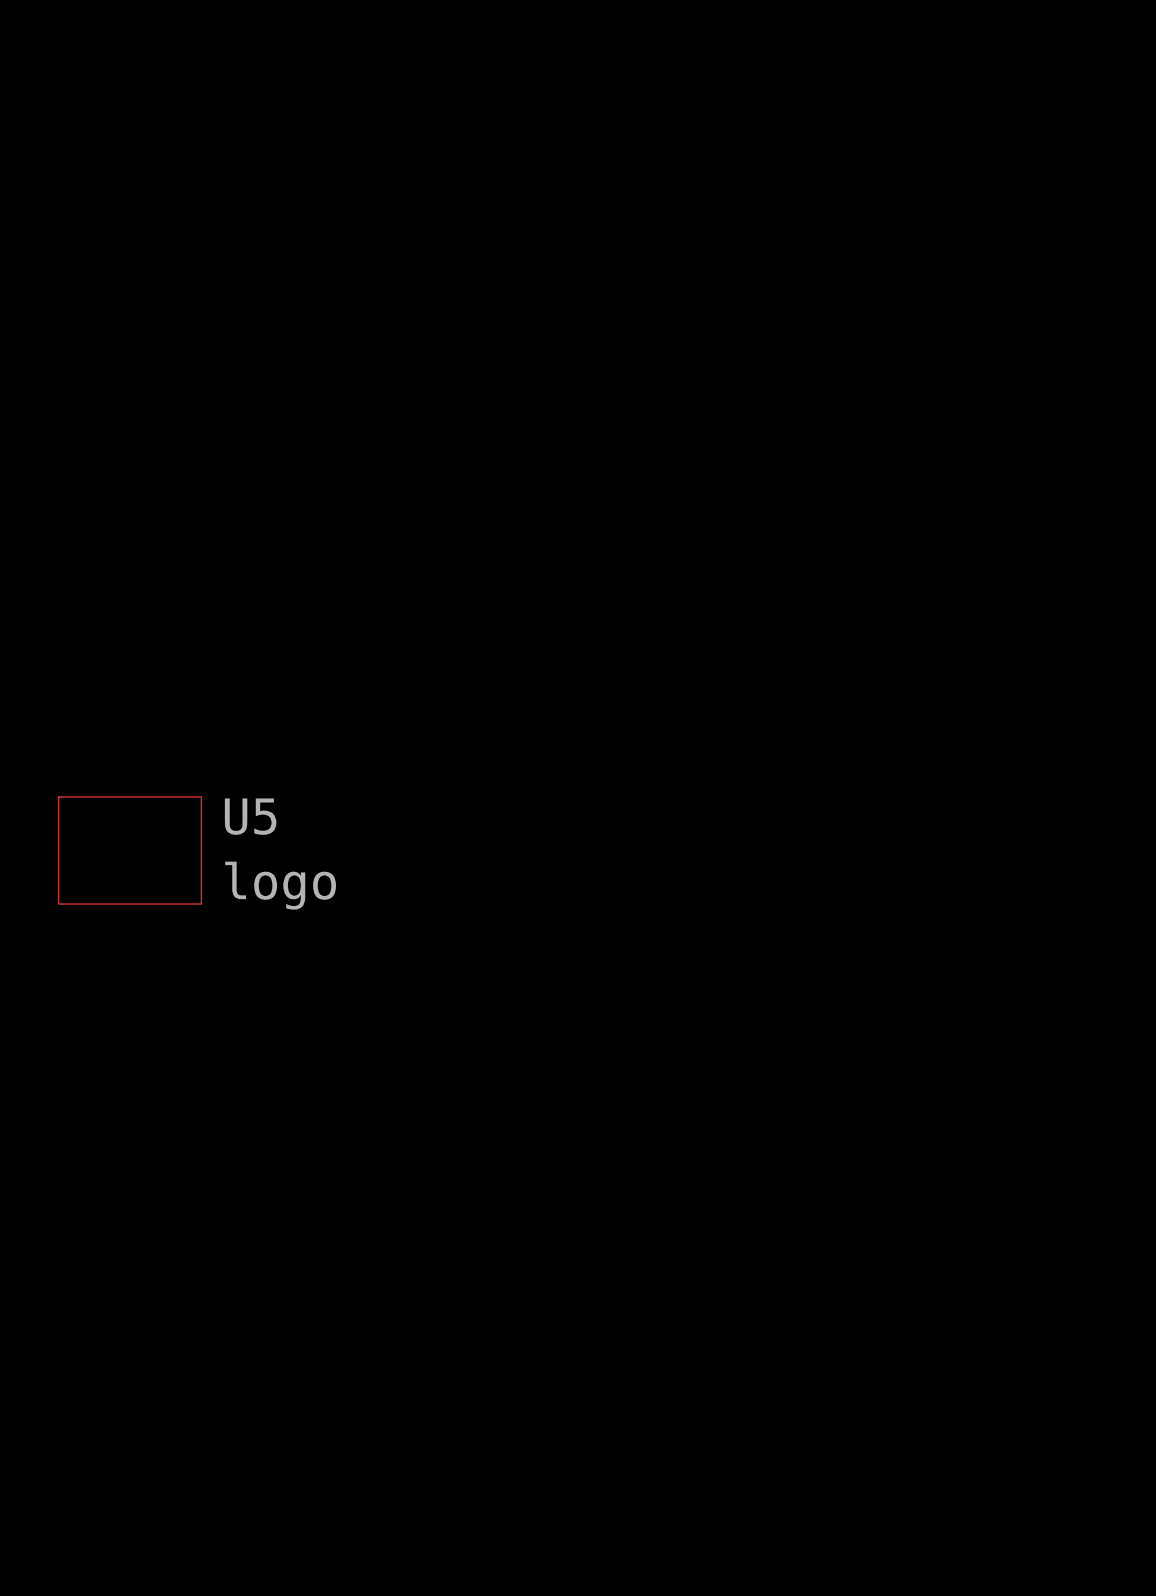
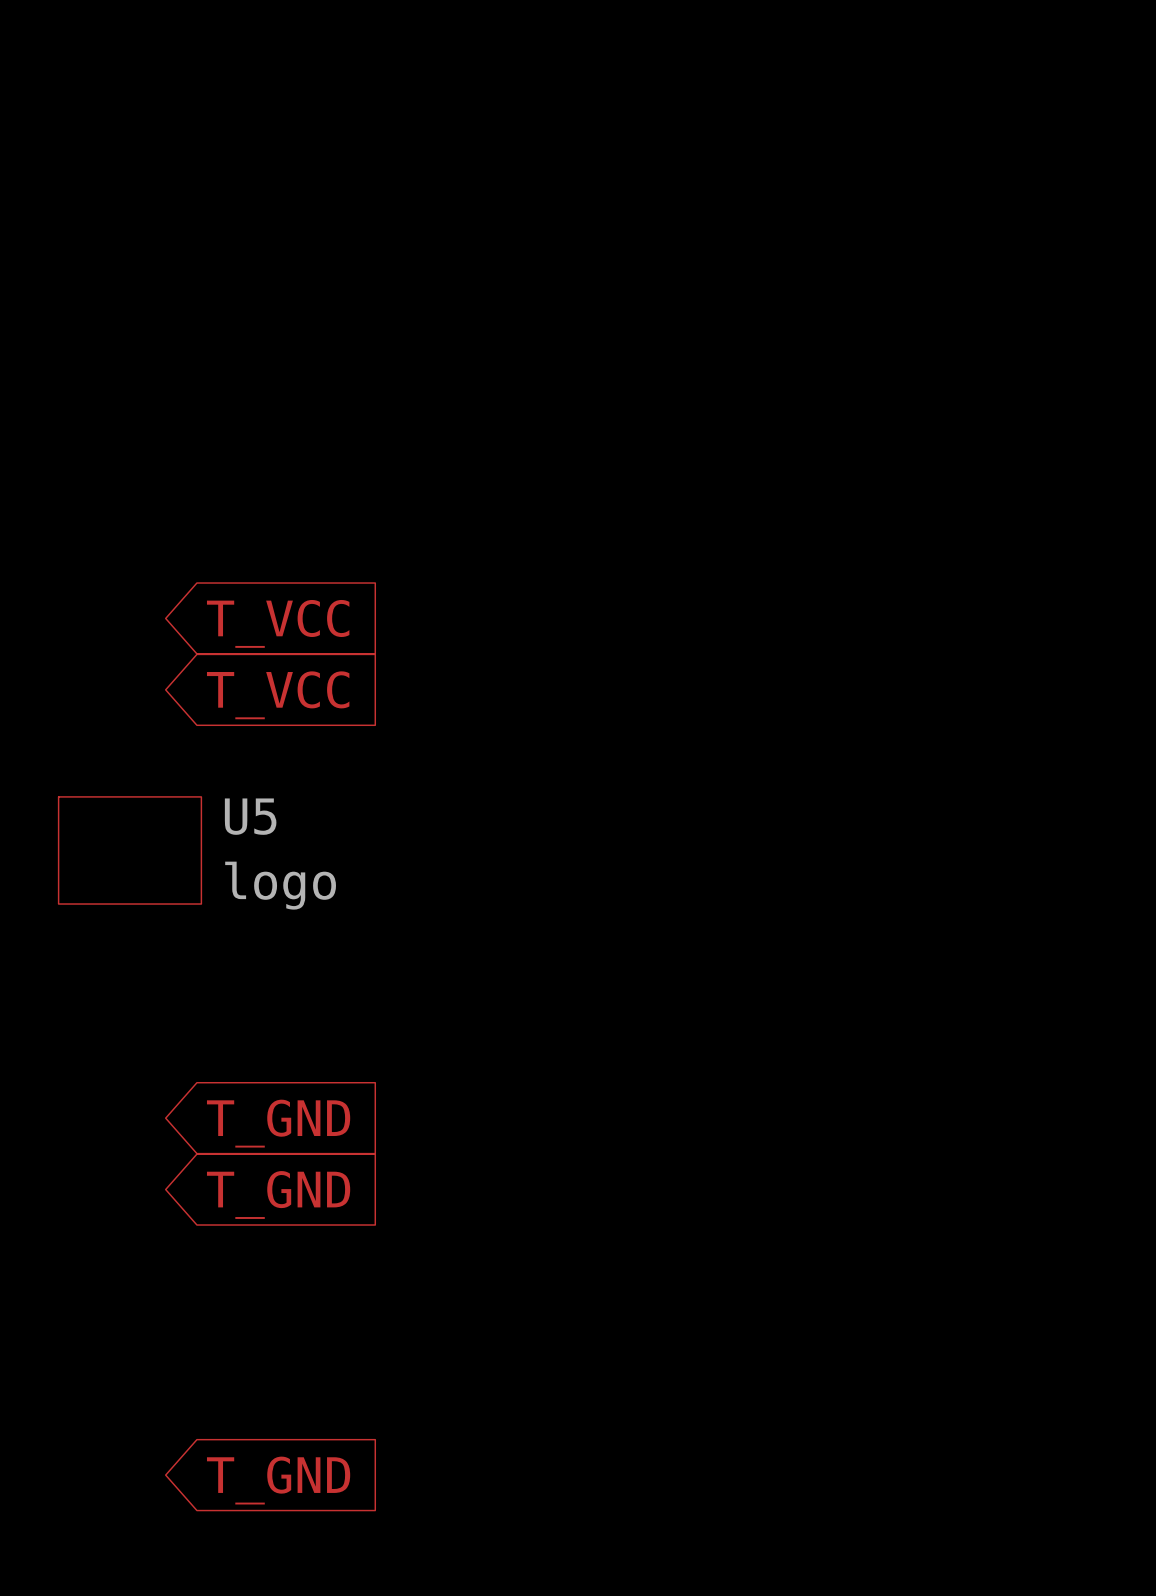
global label: none -> T_VCC (278, 623)
global label: none -> T_VCC (278, 695)
global label: none -> T_GND (278, 1123)
global label: none -> T_GND (278, 1195)
global label: none -> T_GND (278, 1480)

